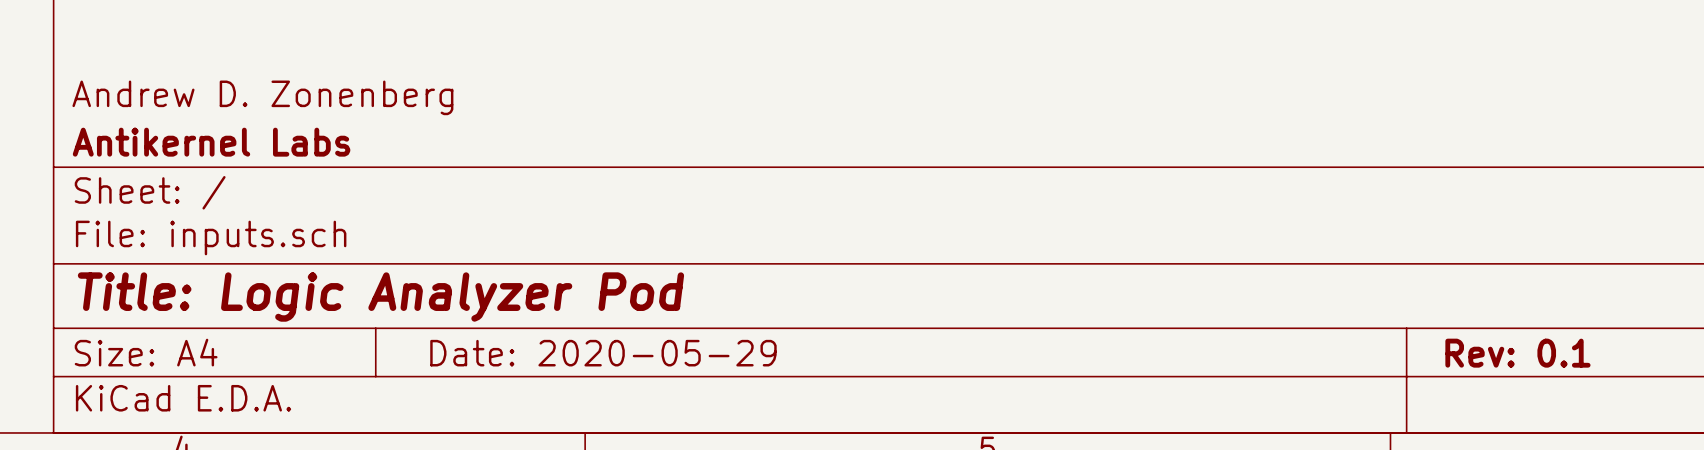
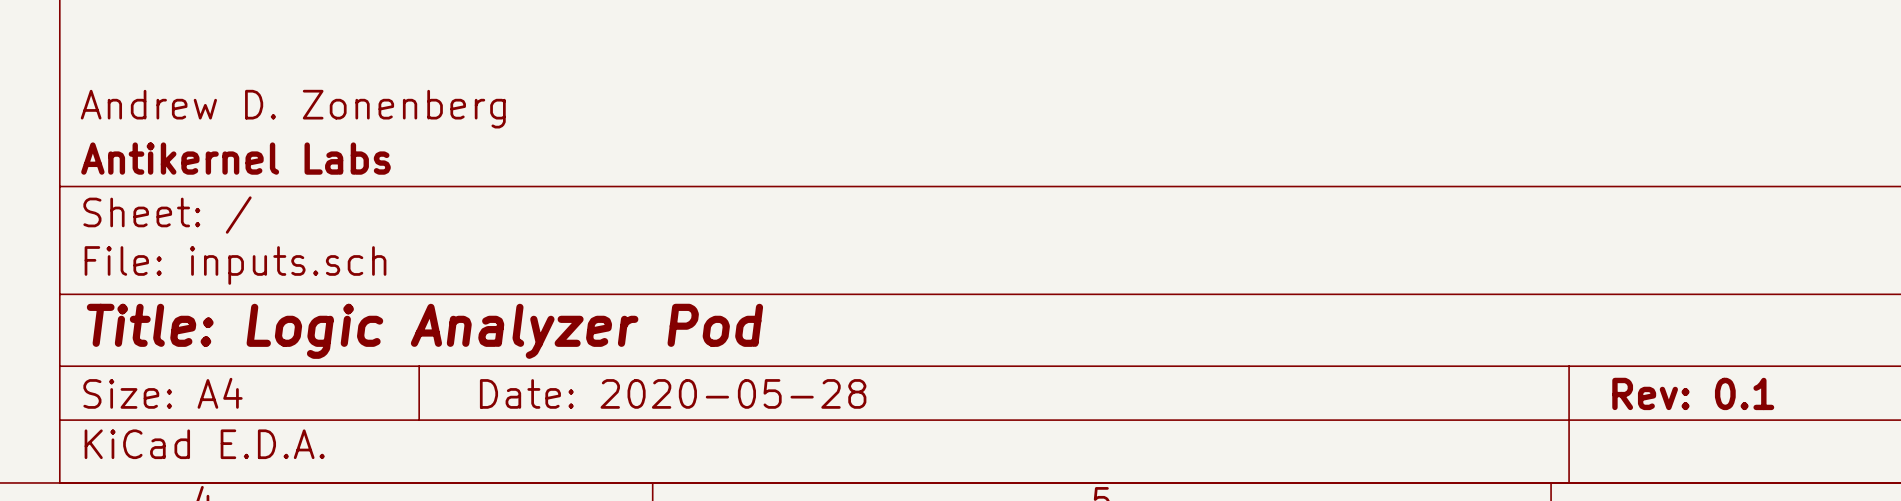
title block: Date: 2020-05-29 (603, 353) -> Date: 2020-05-28 (673, 393)

